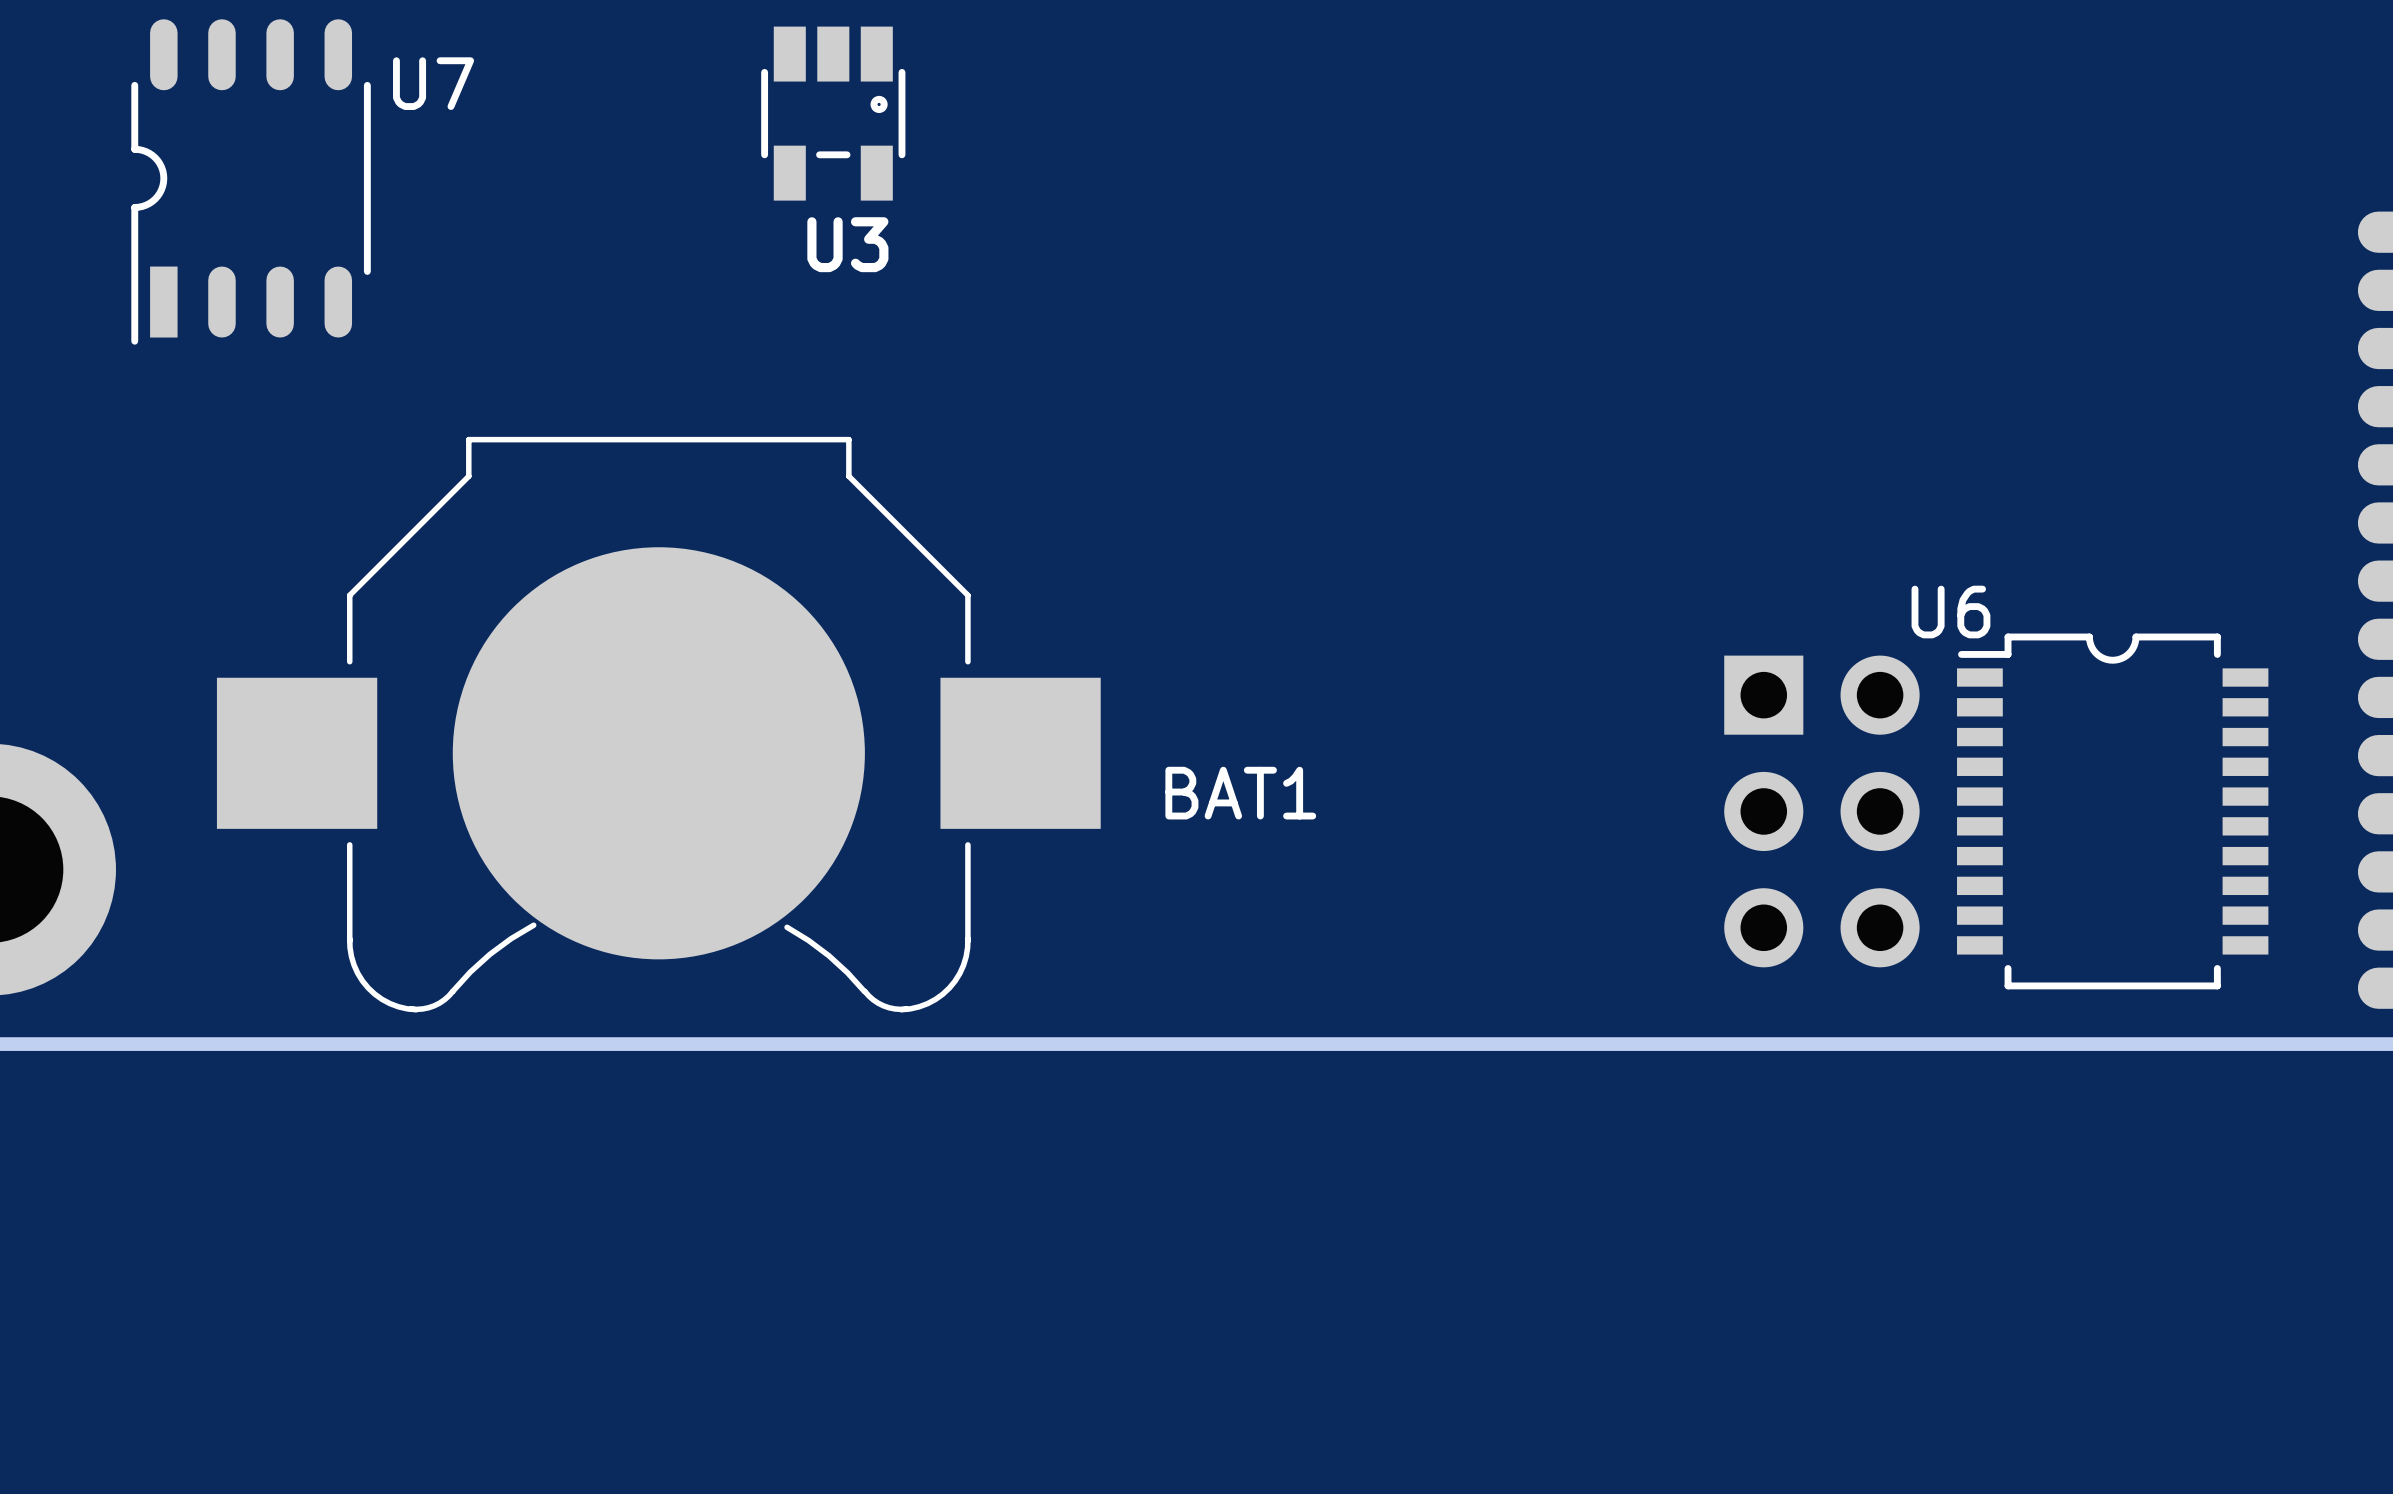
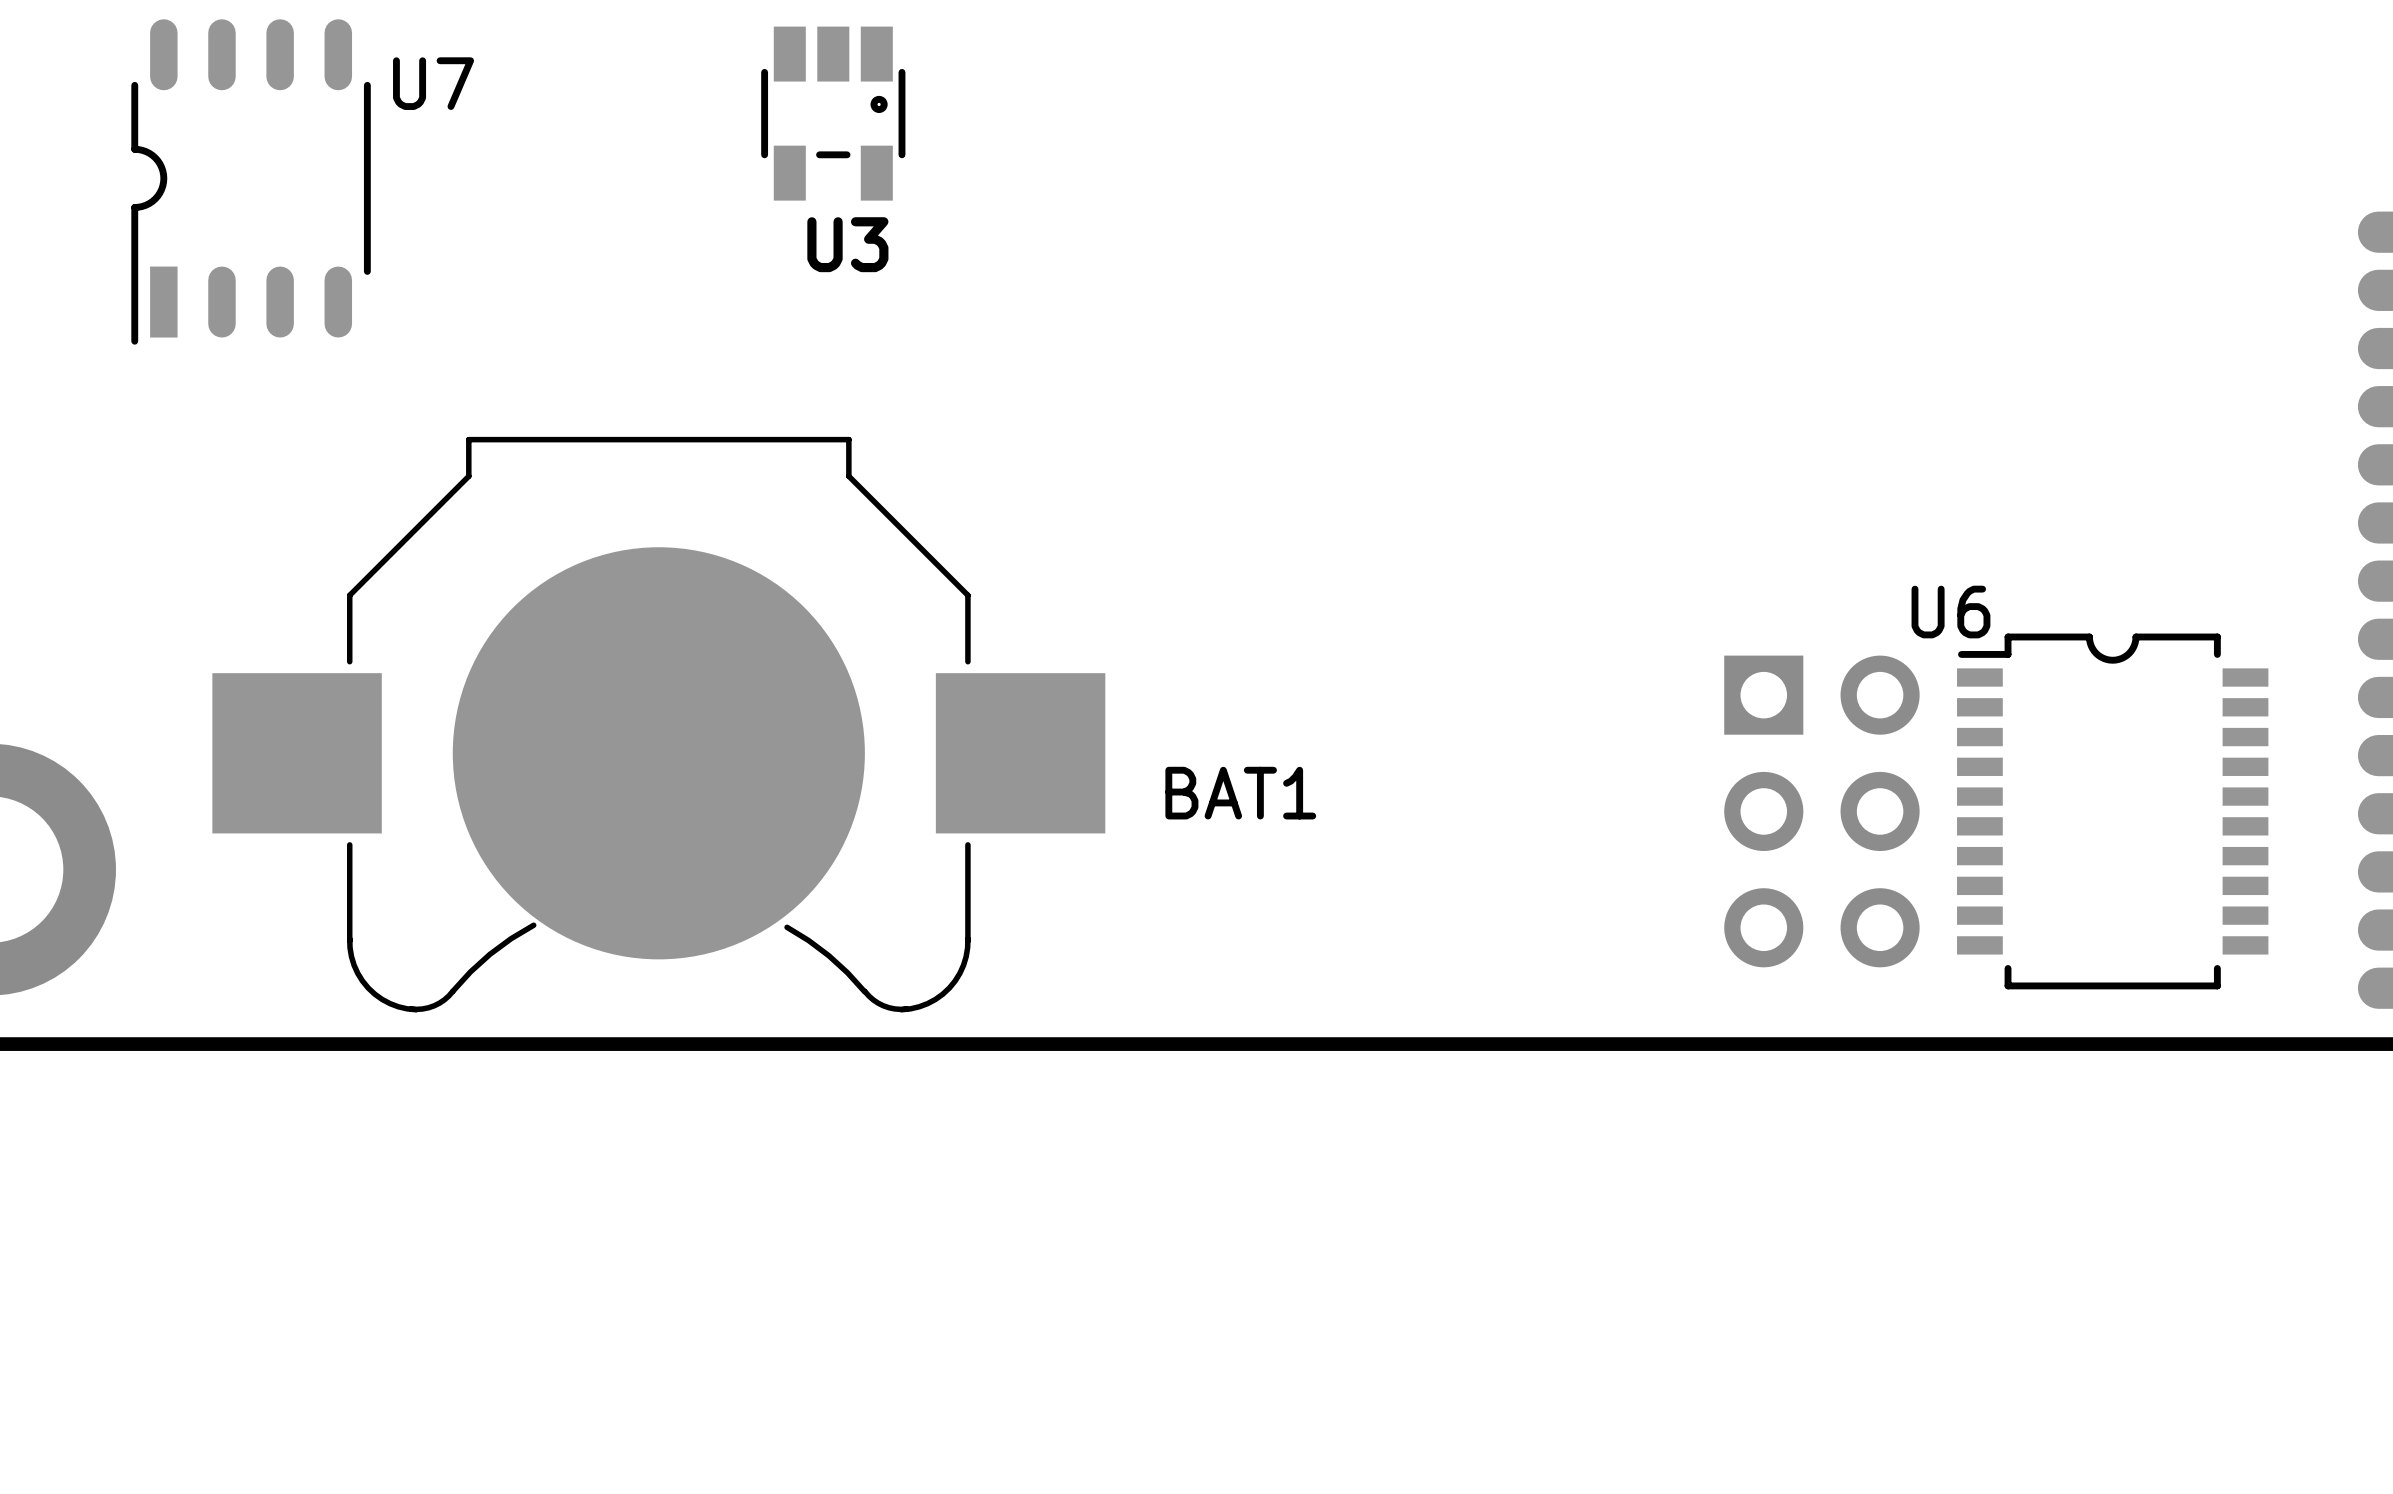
BAT1 footprint: [216, 436, 1101, 1013] -> [212, 436, 1106, 1013]

